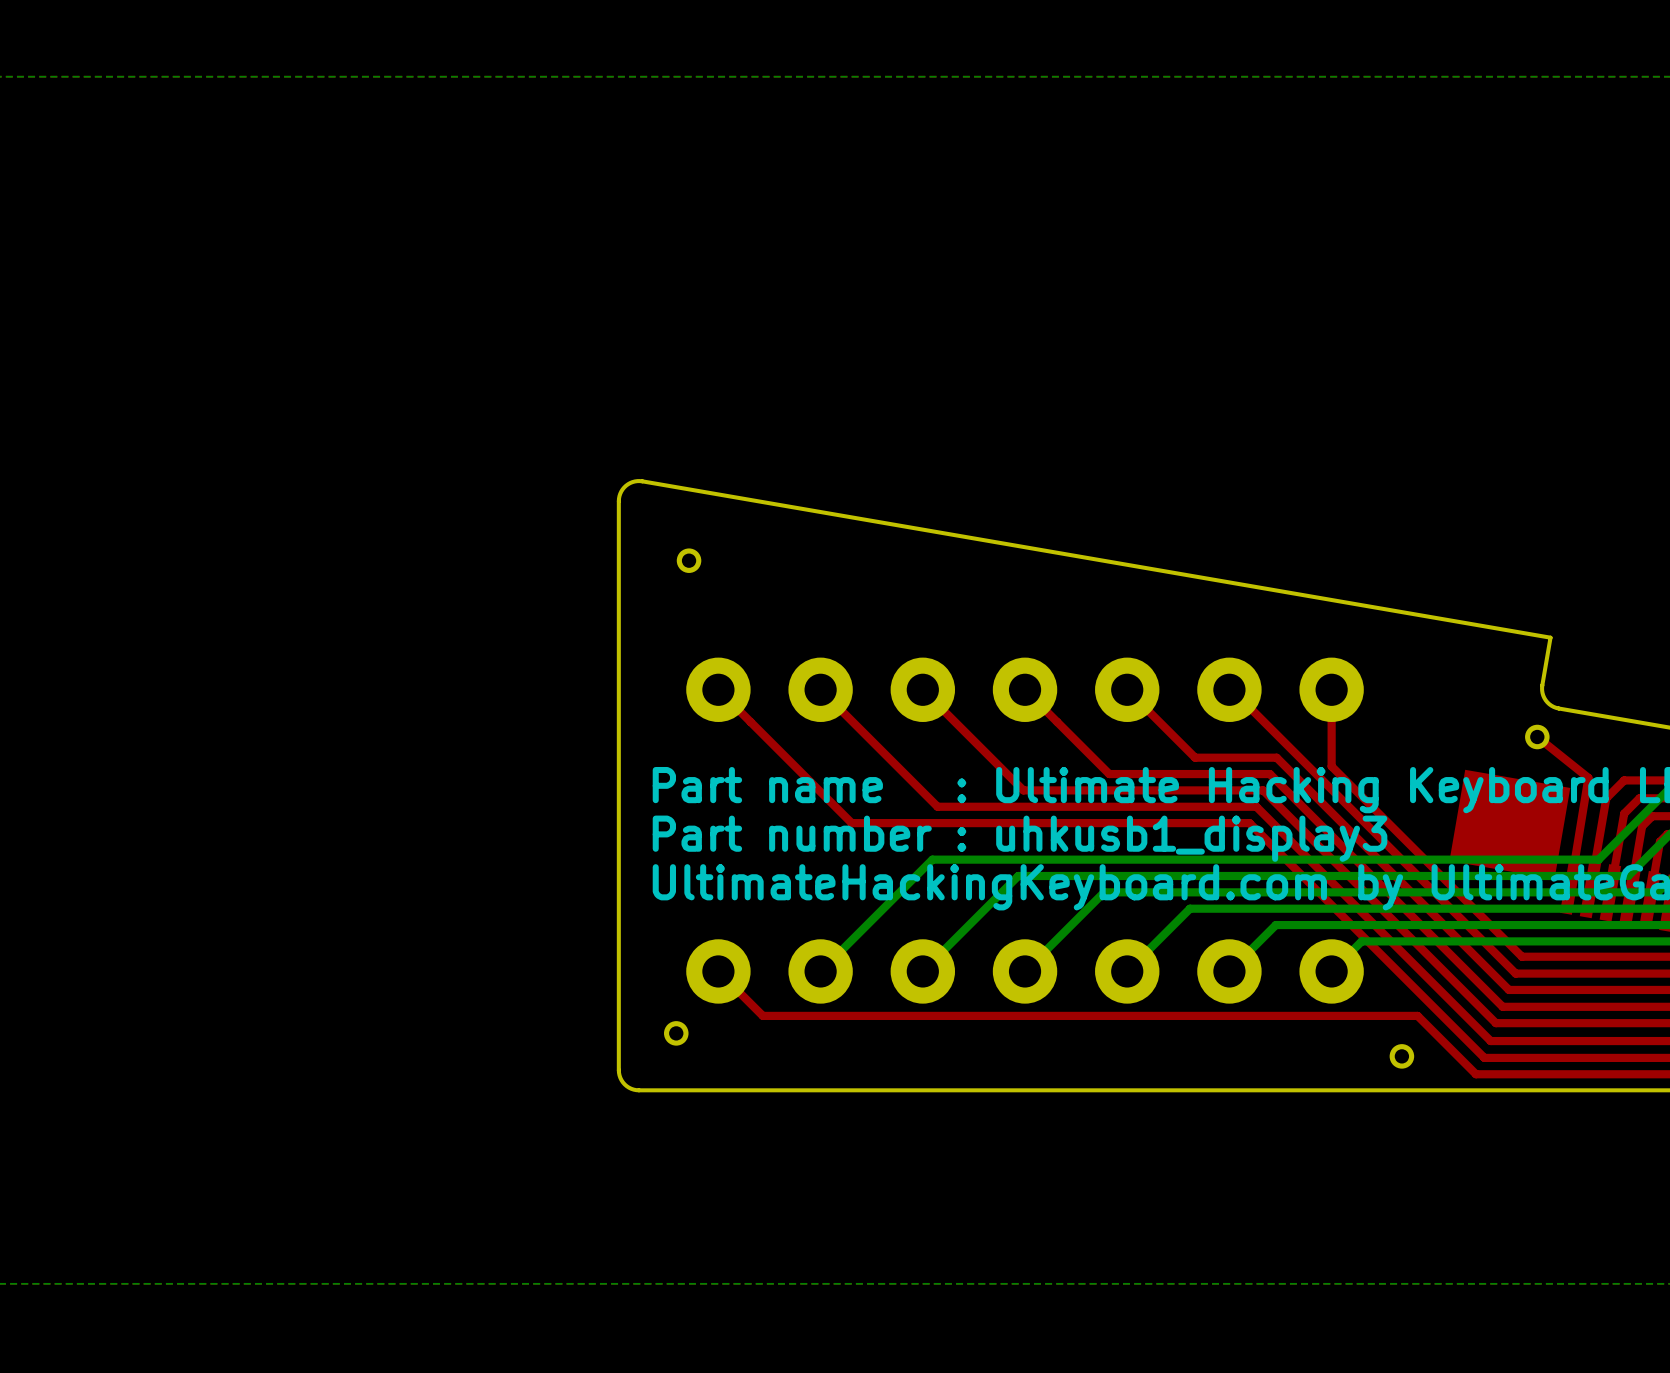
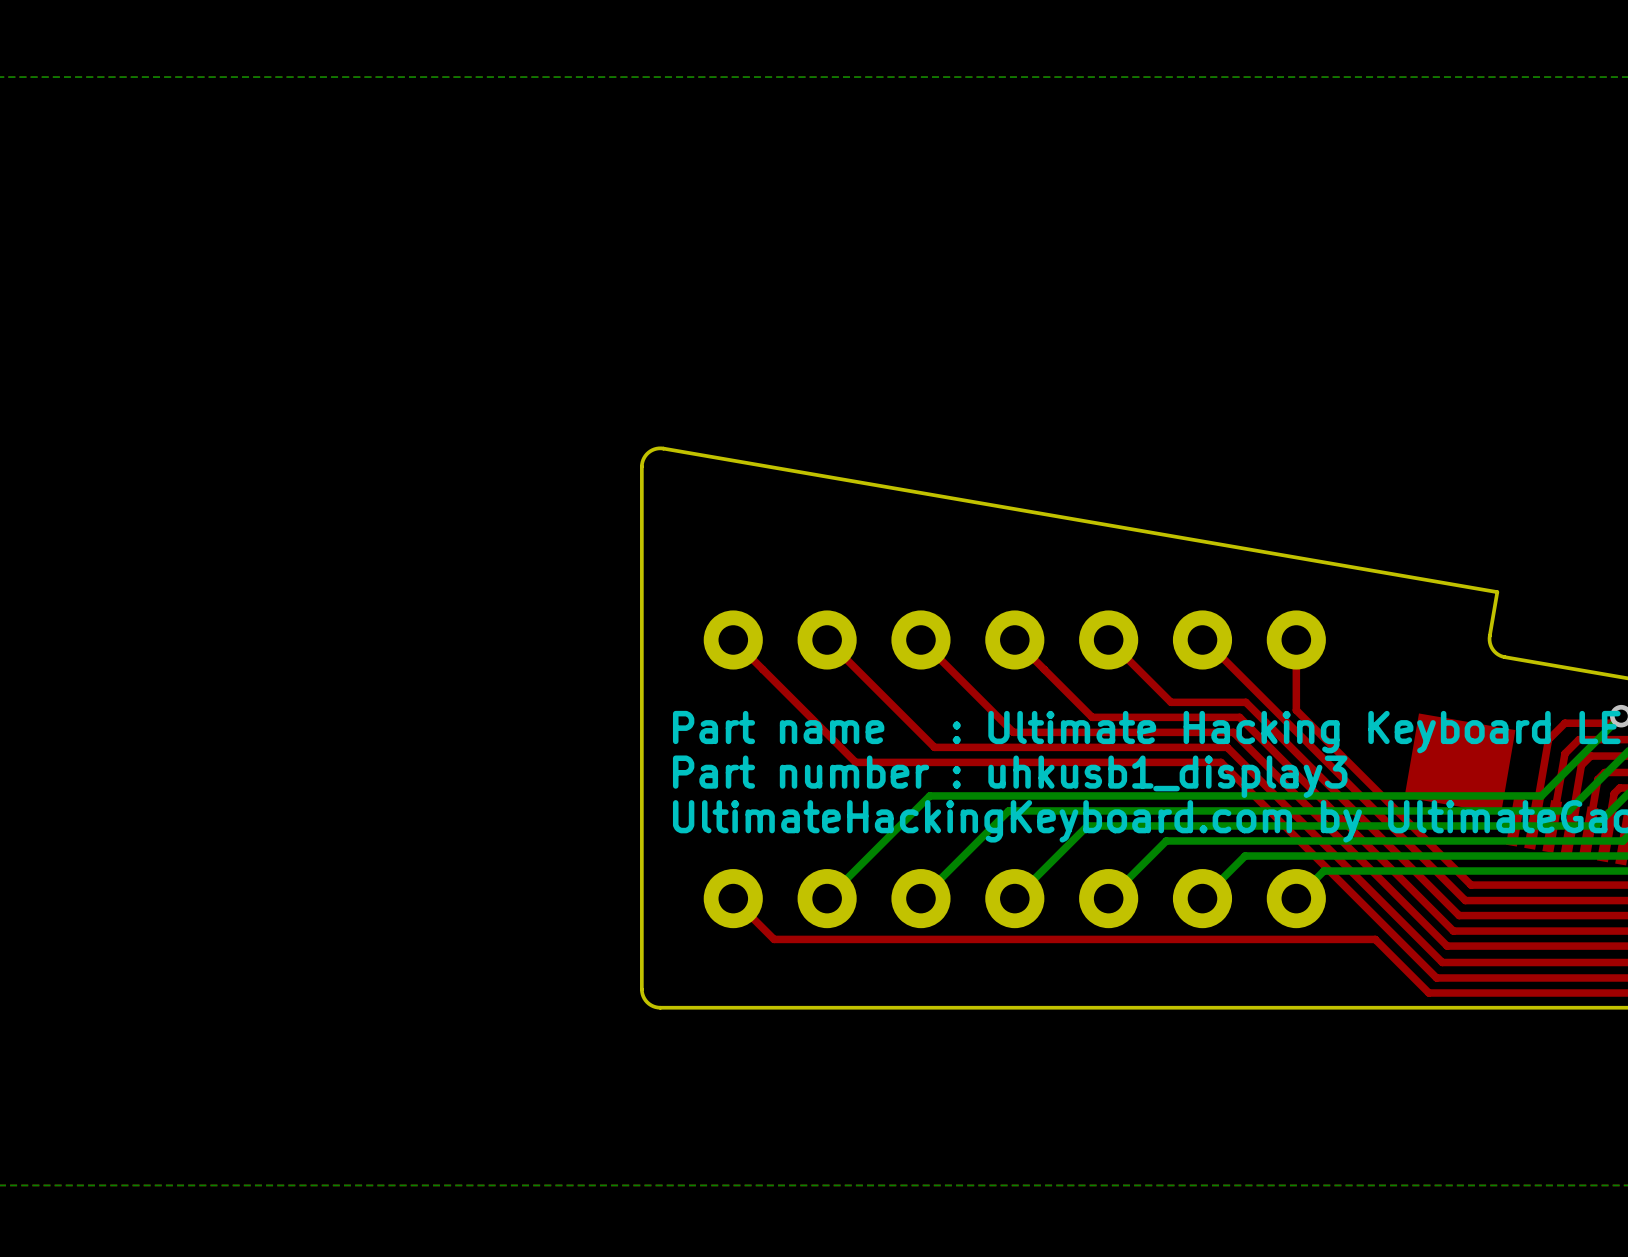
part: (689, 560) -> none
top track: (1537, 737) (1588, 777) (1570, 886) -> none
part: (1537, 737) -> none
part: (676, 1033) -> none
part: (1401, 1056) -> none

